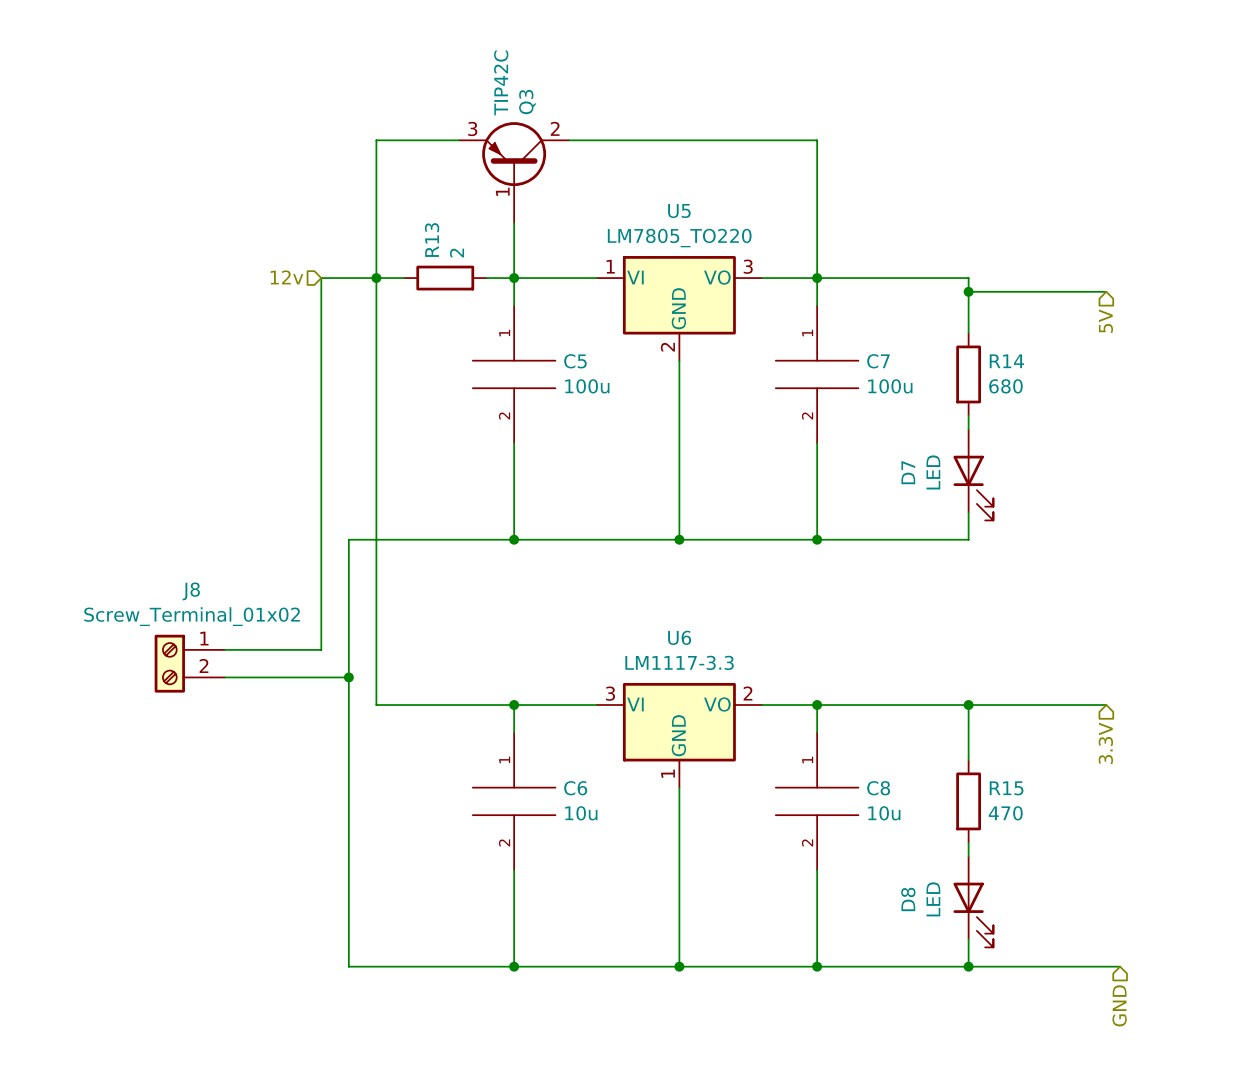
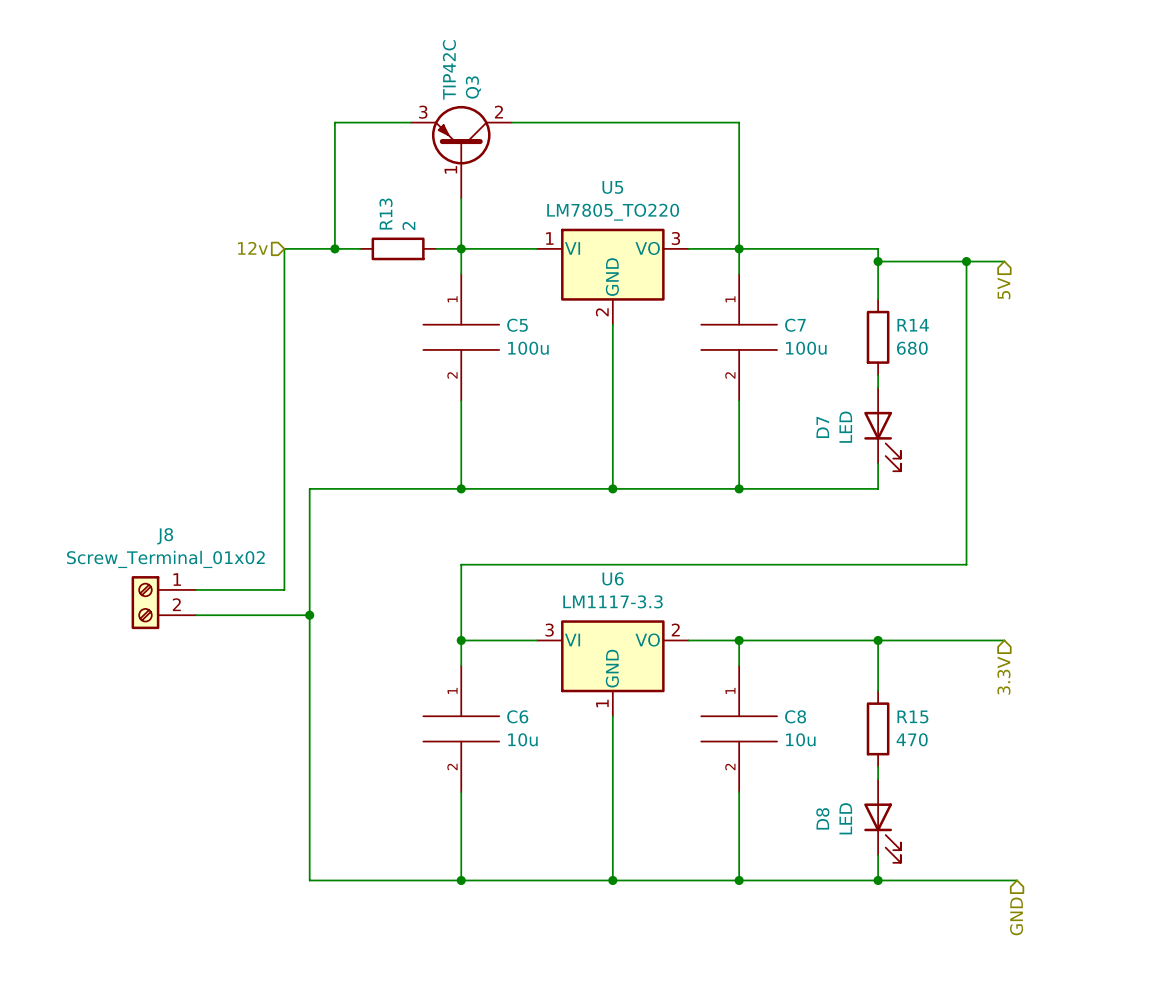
wire: (376, 278) (376, 705) (514, 705) -> (966, 261) (966, 564) (461, 564) (461, 640)
junction: none -> (966, 261)

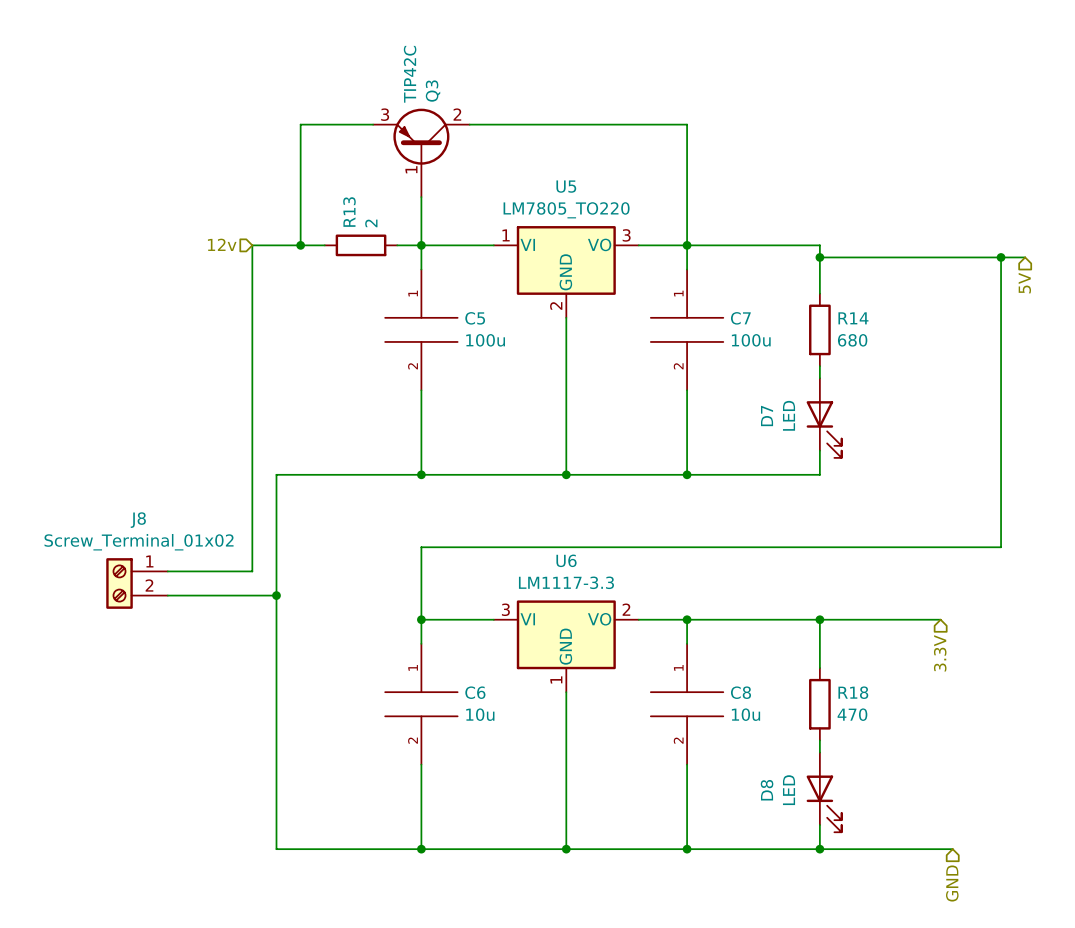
wire: (966, 261) (966, 564) -> (1001, 257) (1001, 547) (904, 547)
junction: (966, 261) -> none
wire: none -> (940, 257) (1025, 257)
junction: none -> (1001, 257)
hierarchical label position: 5V (1004, 288) -> 5V (1024, 283)
R15 name: R15 (912, 716) -> R18 (853, 692)

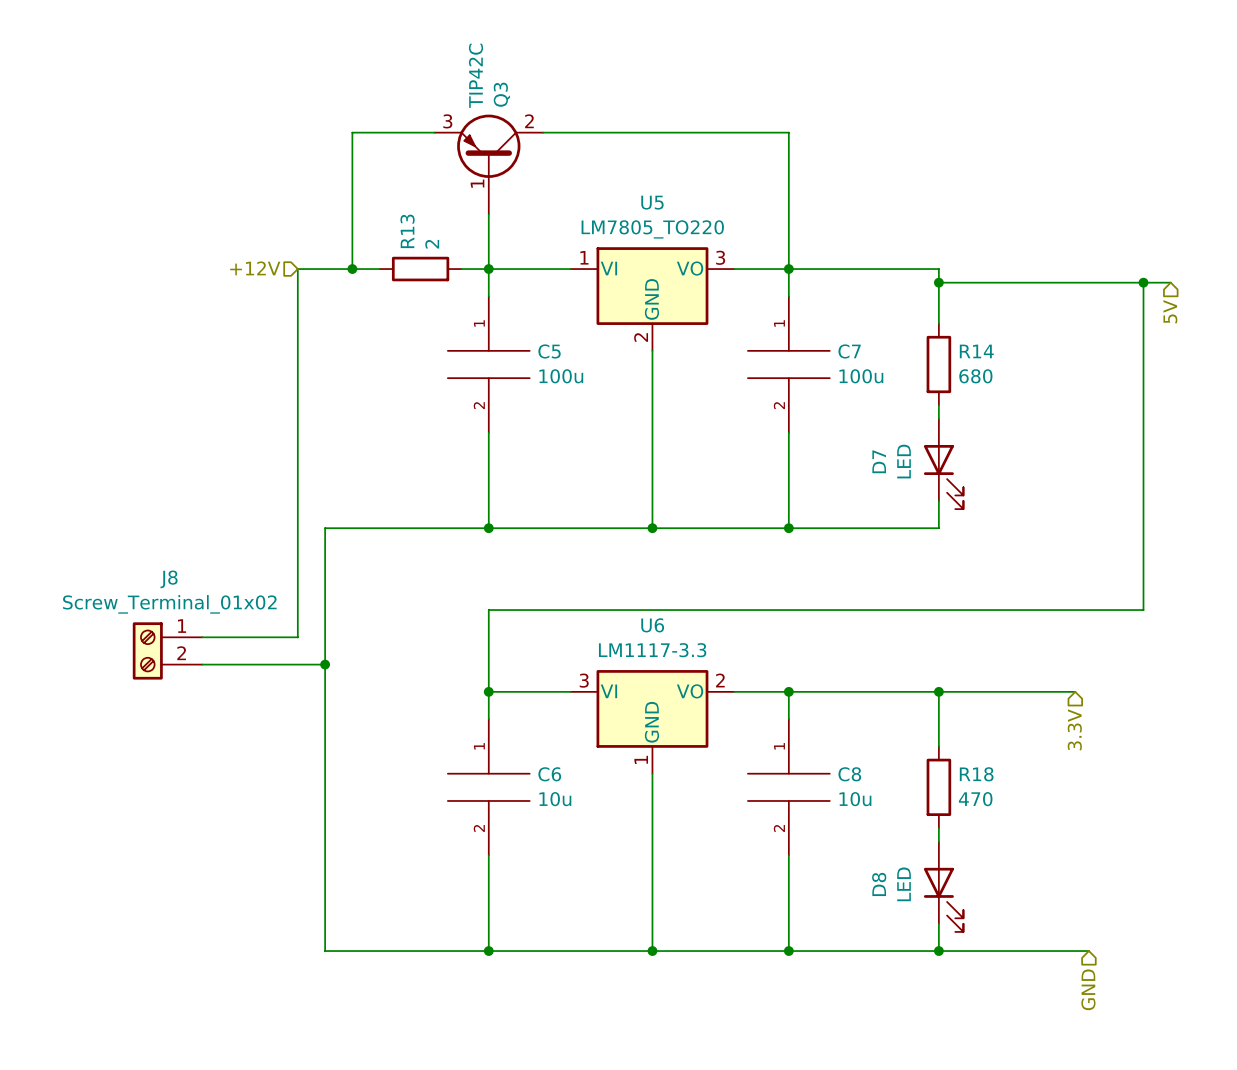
hierarchical label: 12v (222, 244) -> +12V (255, 268)

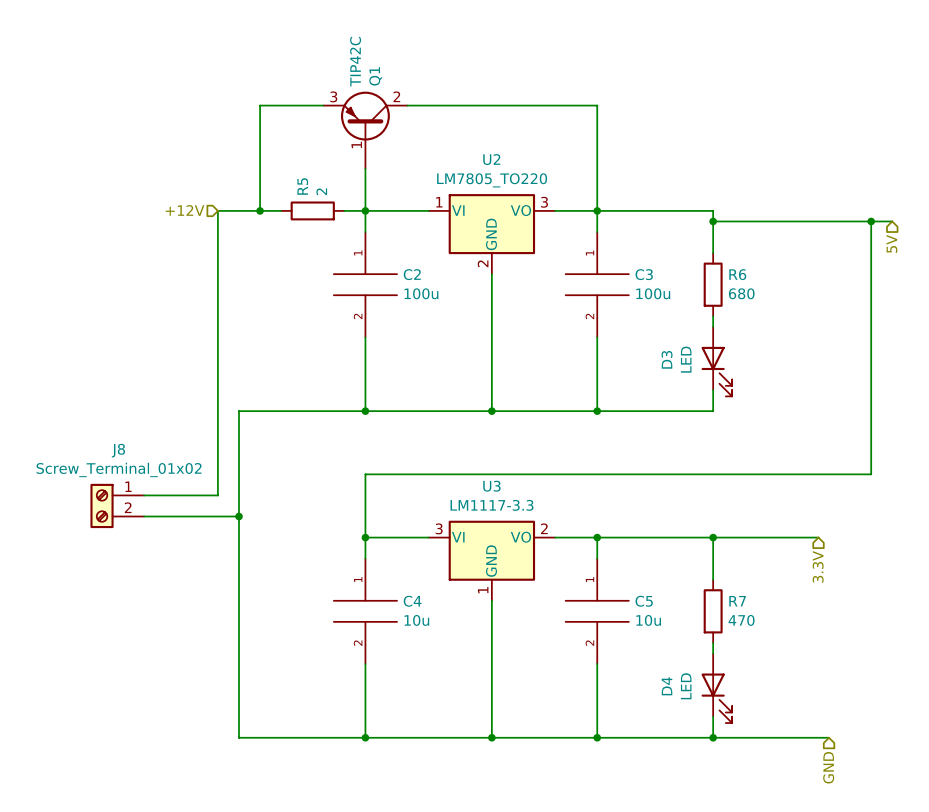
Q3 name: Q3 (501, 94) -> Q1 (375, 76)
U5 name: U5 (652, 202) -> U2 (491, 159)
R13 name: R13 (407, 231) -> R5 (302, 186)
C5 name: C5 (549, 351) -> C2 (412, 274)
C7 name: C7 (849, 351) -> C3 (644, 274)
R14 name: R14 (976, 351) -> R6 (737, 274)
D7 name: D7 (879, 461) -> D3 (667, 359)
U6 name: U6 (652, 625) -> U3 (491, 486)
C6 name: C6 (549, 774) -> C4 (412, 601)
C8 name: C8 (849, 774) -> C5 (644, 601)
R18 name: R18 (976, 774) -> R7 (737, 601)
D8 name: D8 (879, 884) -> D4 (667, 686)

